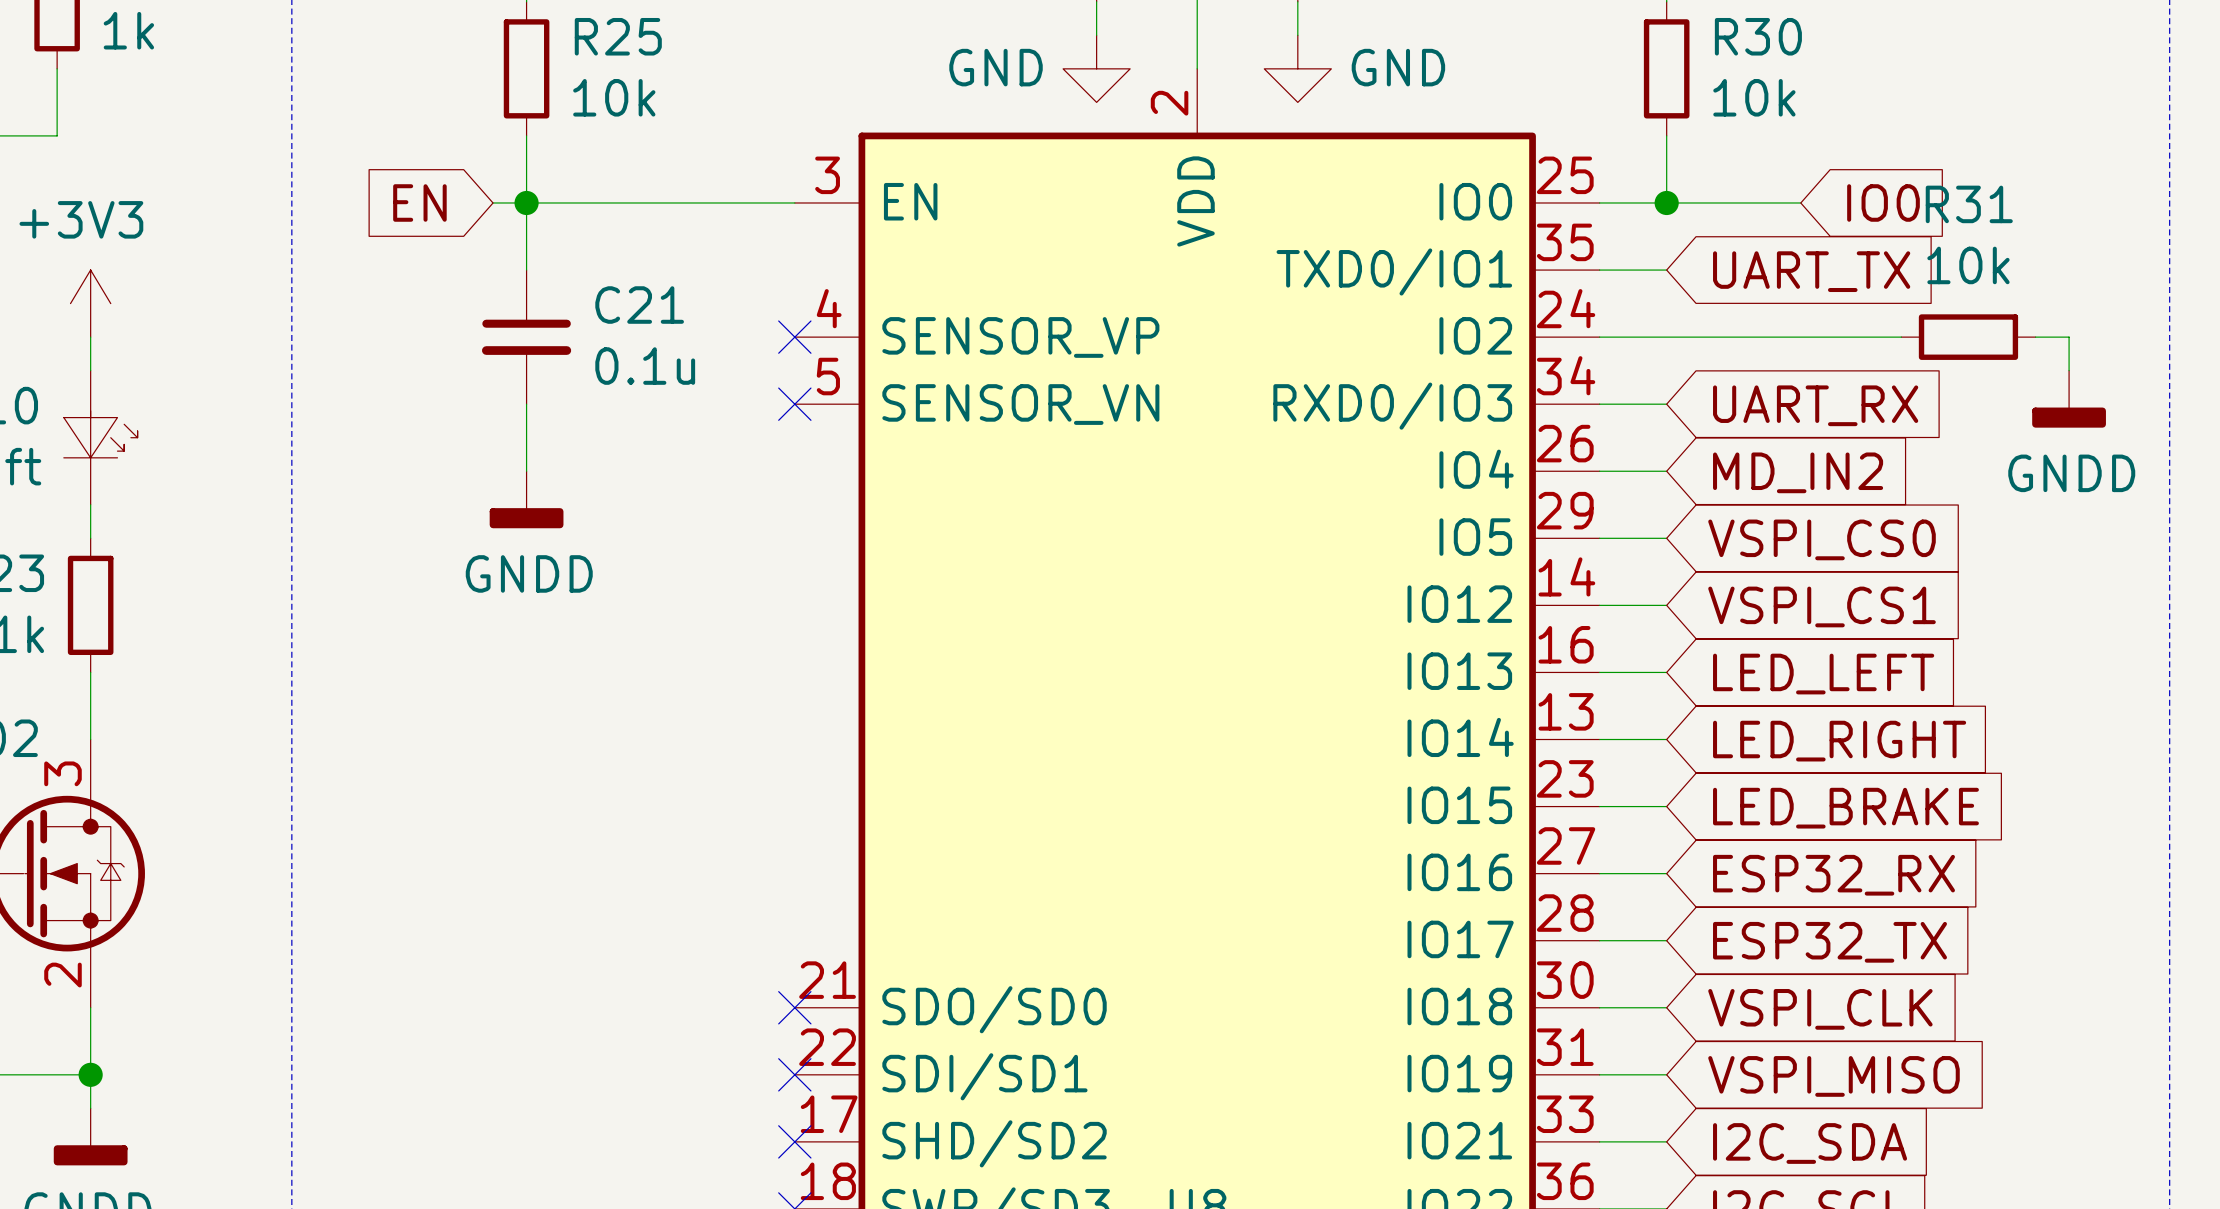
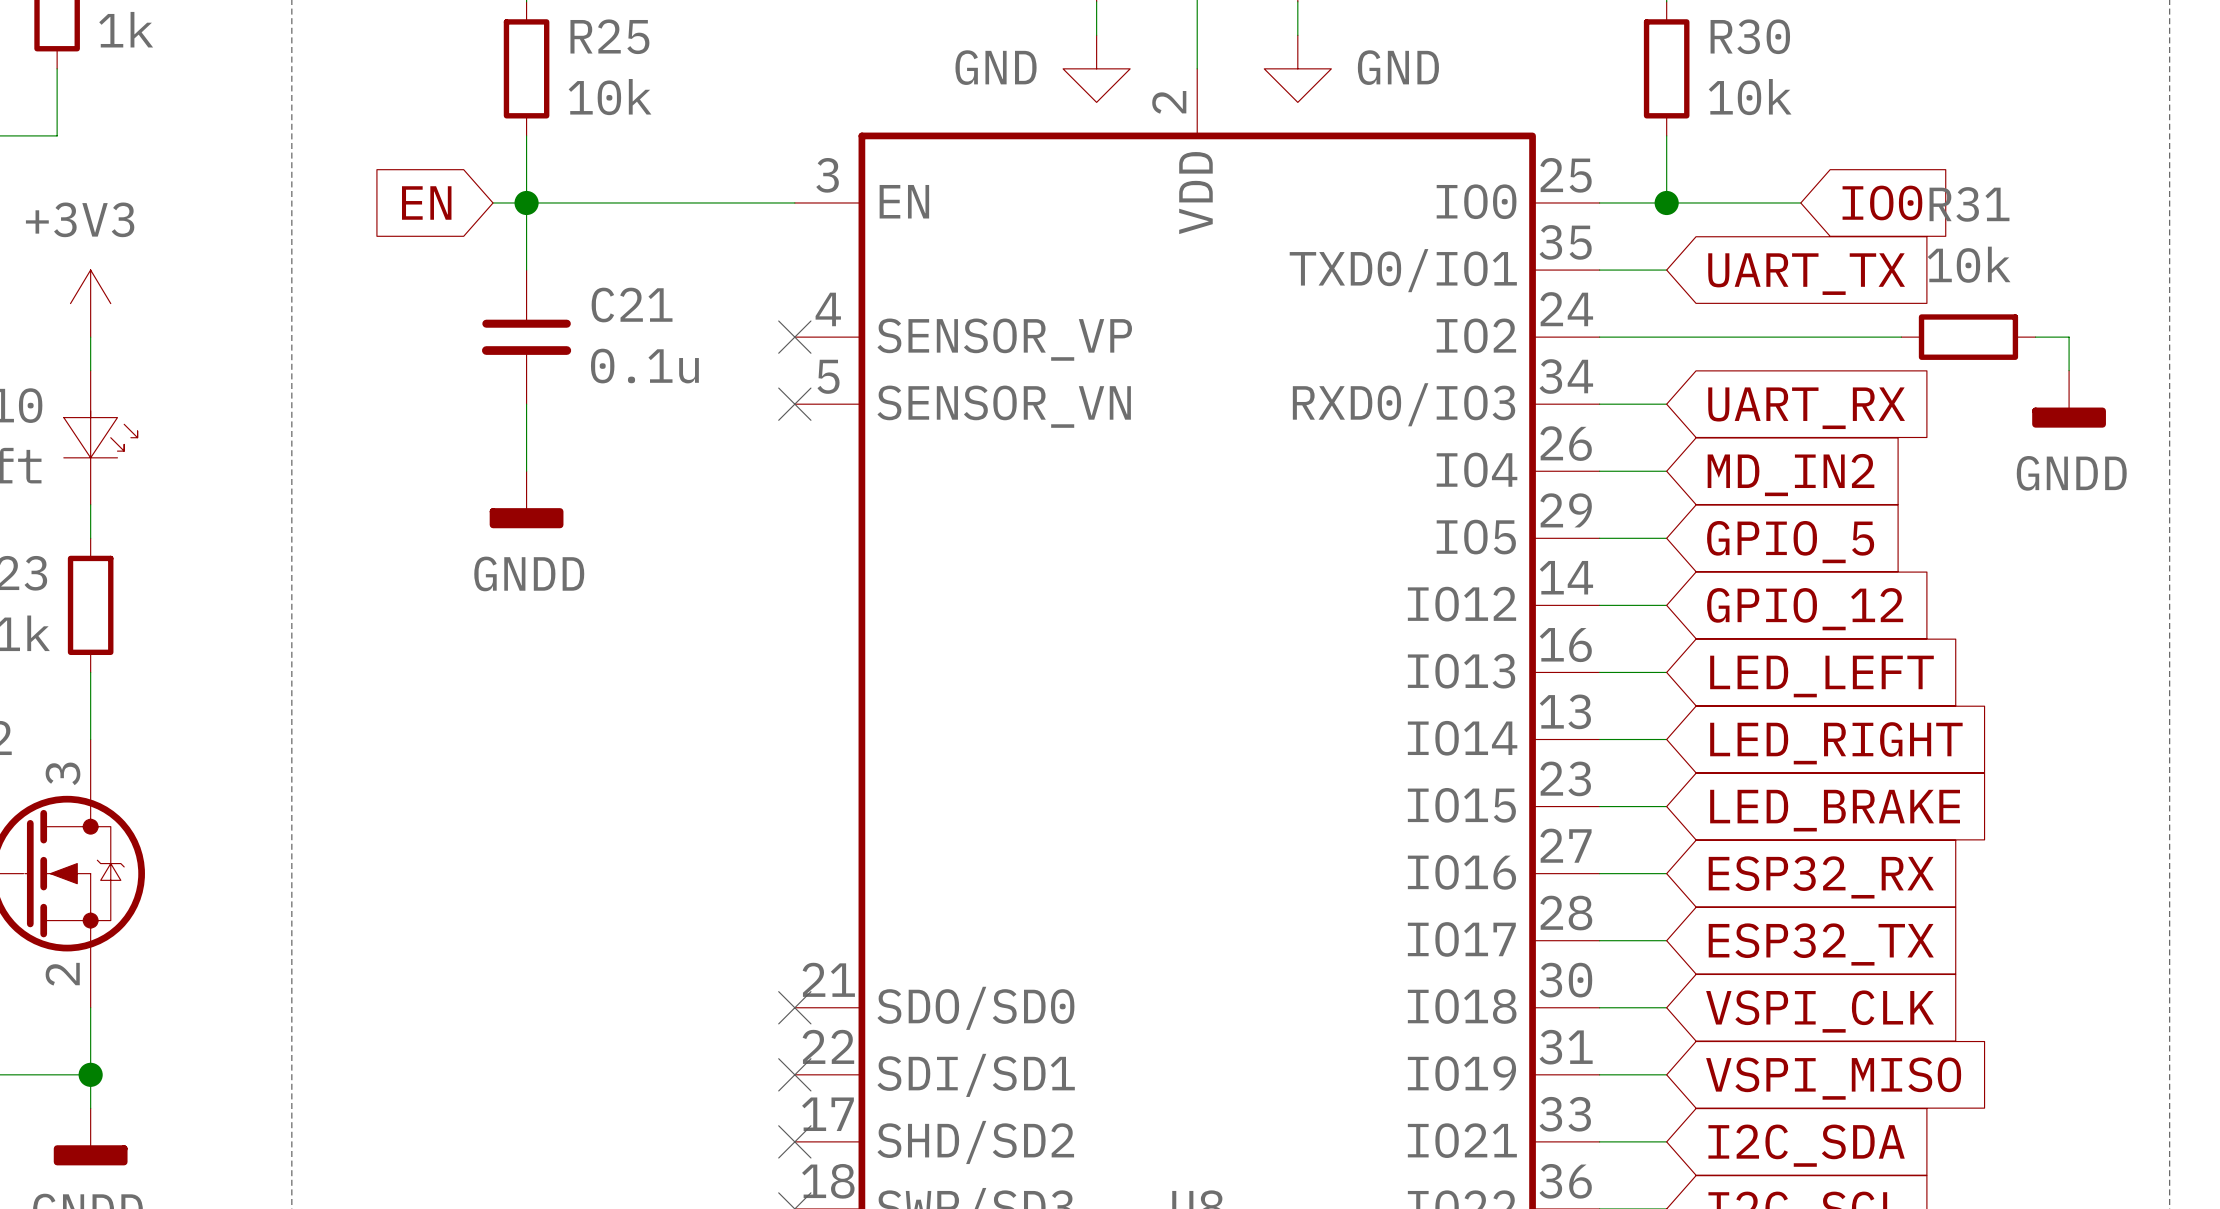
global label: VSPI_CS0 (1822, 539) -> GPIO_5 (1790, 542)
global label: VSPI_CS1 (1822, 606) -> GPIO_12 (1805, 609)

